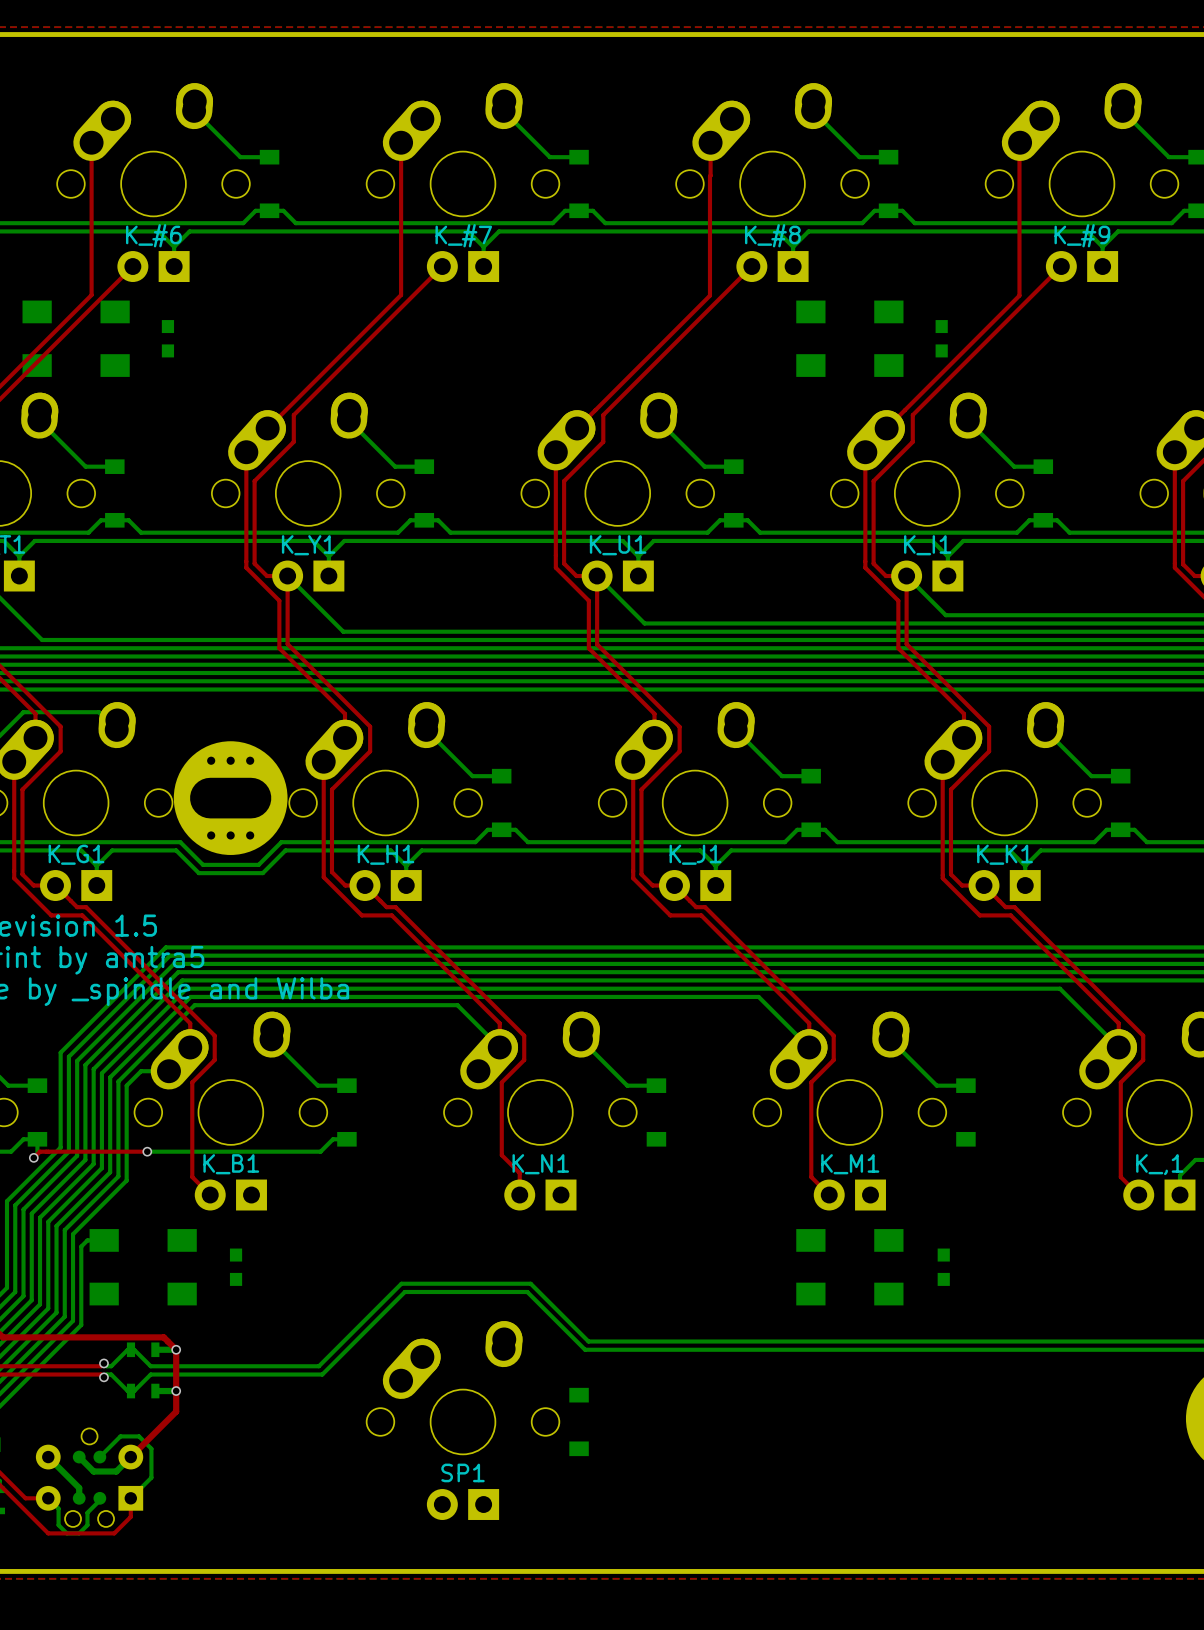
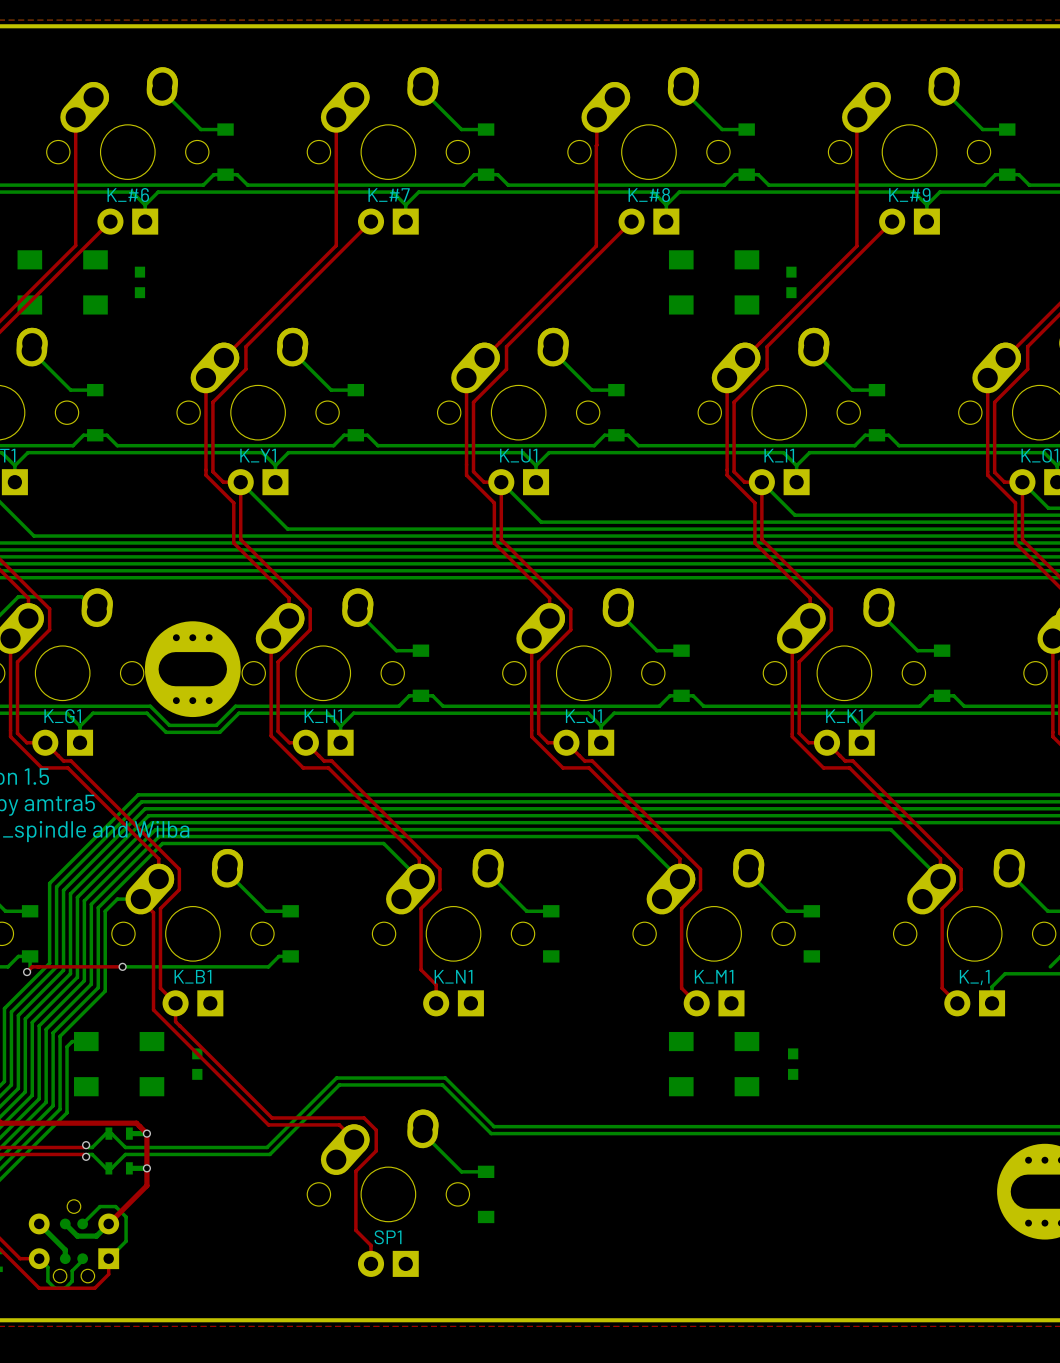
top track: none -> (140, 899) (153, 912) (153, 1009) (268, 1124) (339, 1124) (354, 1139)
top track: none -> (175, 1003) (175, 1021) (179, 1025)
top track: none -> (179, 1025) (272, 1117) (364, 1117) (376, 1130) (376, 1150) (355, 1171) (355, 1230) (371, 1245) (371, 1263)
bottom track: none -> (422, 1132) (461, 1171) (486, 1171)

